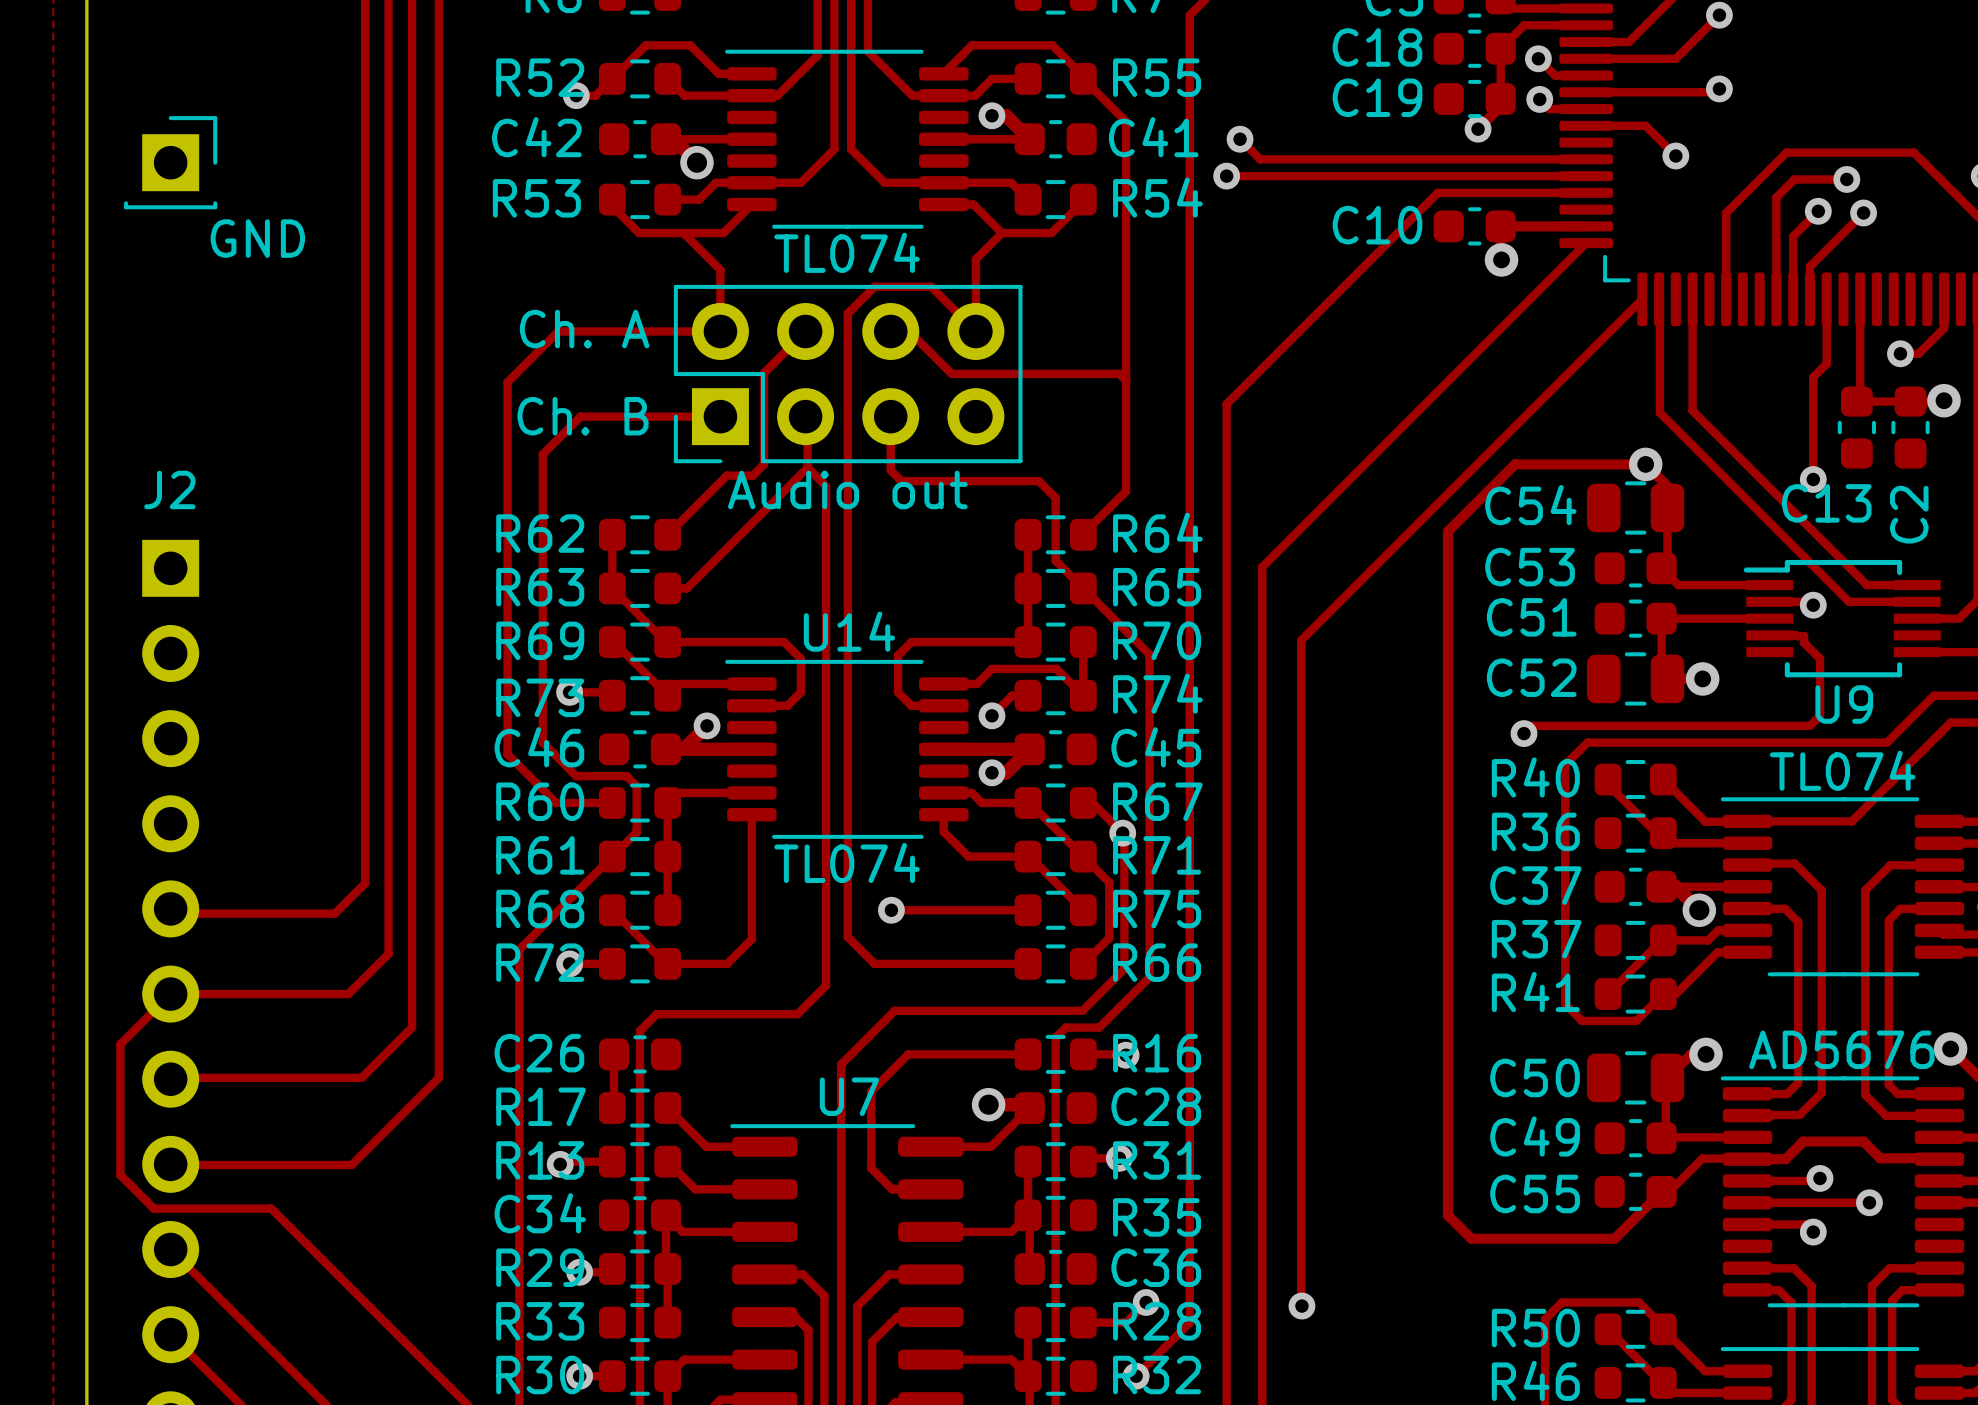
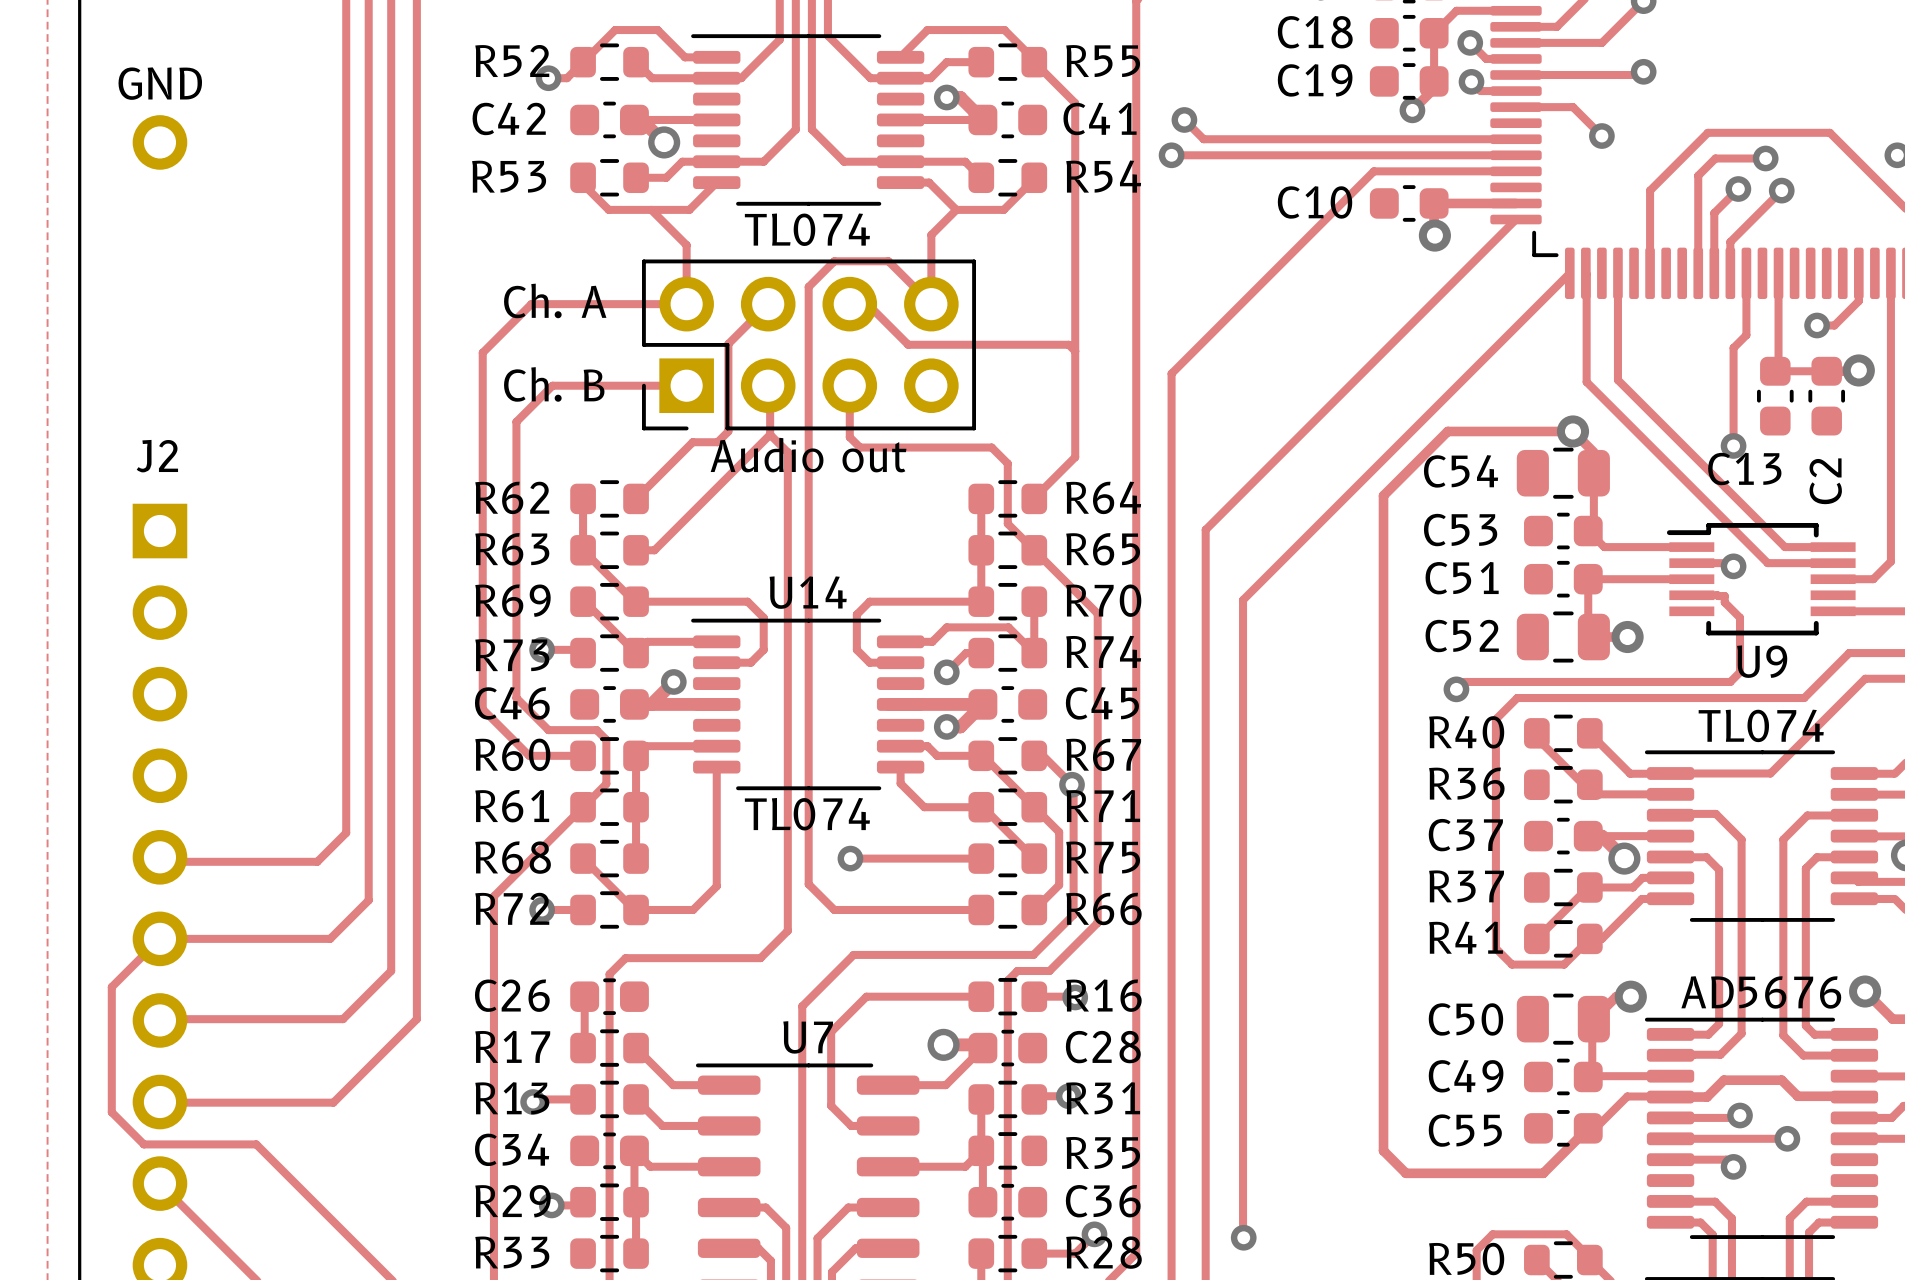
part footprint: [124, 116, 218, 210] -> [132, 115, 188, 170]
text: GND (257, 238) -> none

